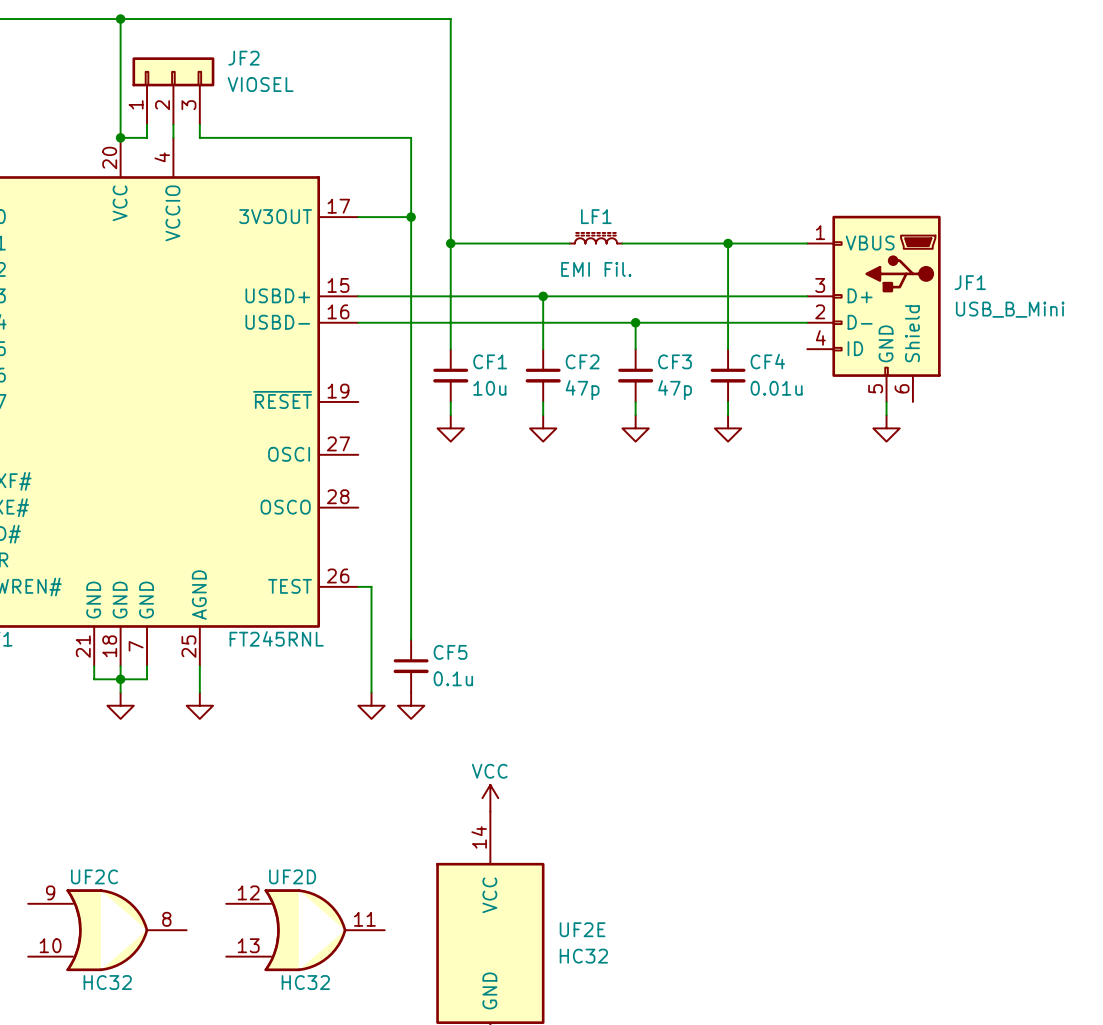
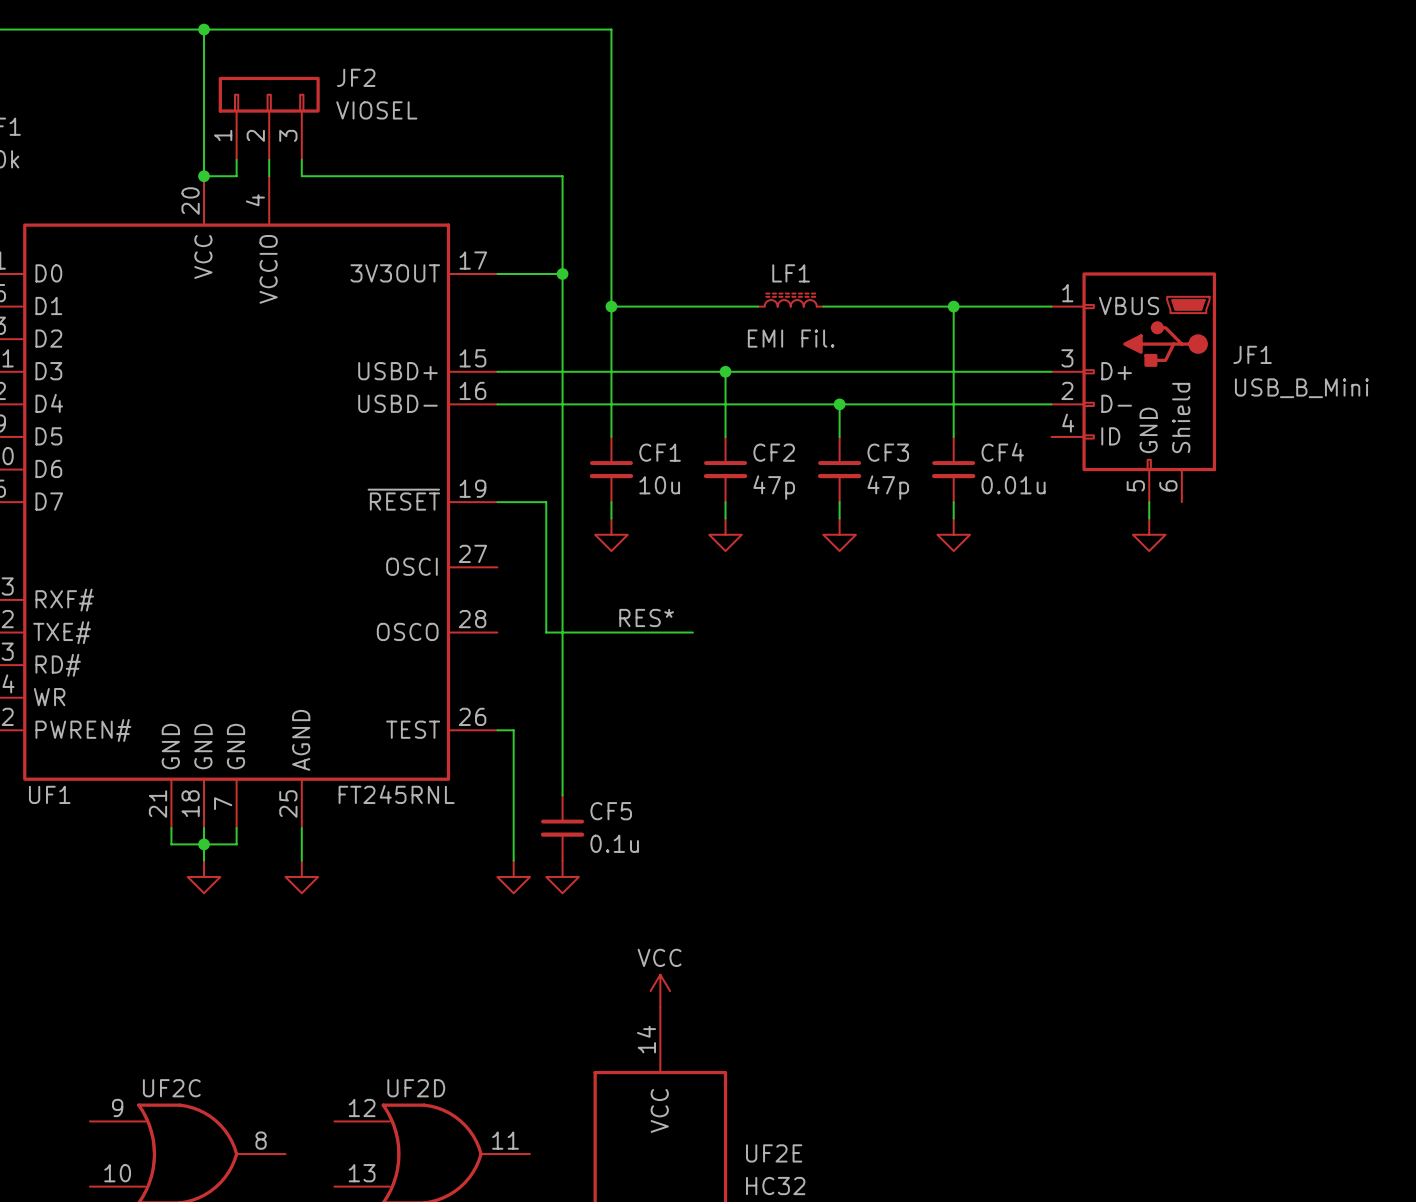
wire: none -> (497, 502) (546, 502) (546, 632) (692, 632)
label: none -> RES* (646, 617)

